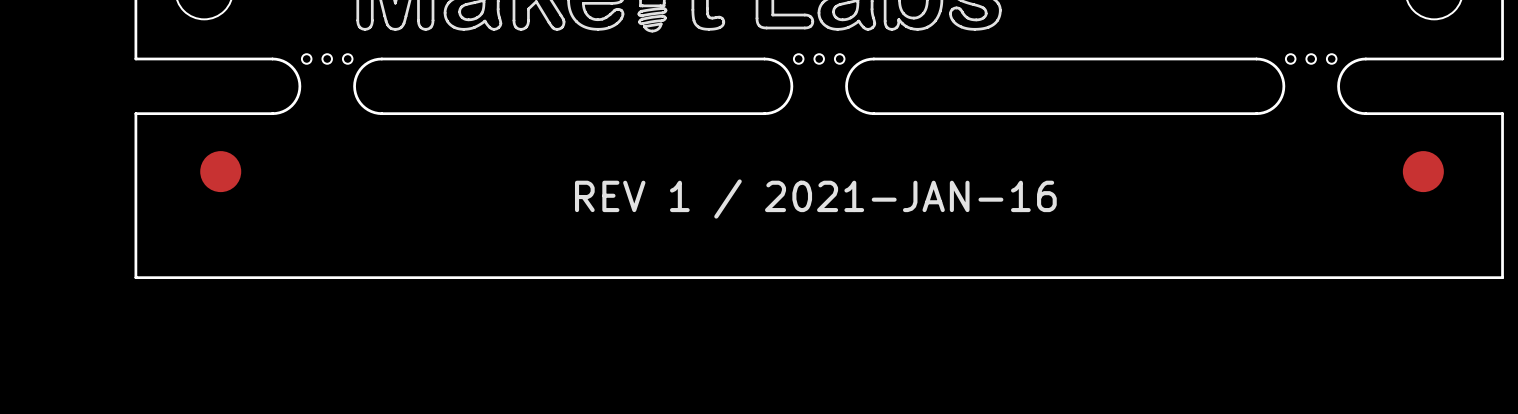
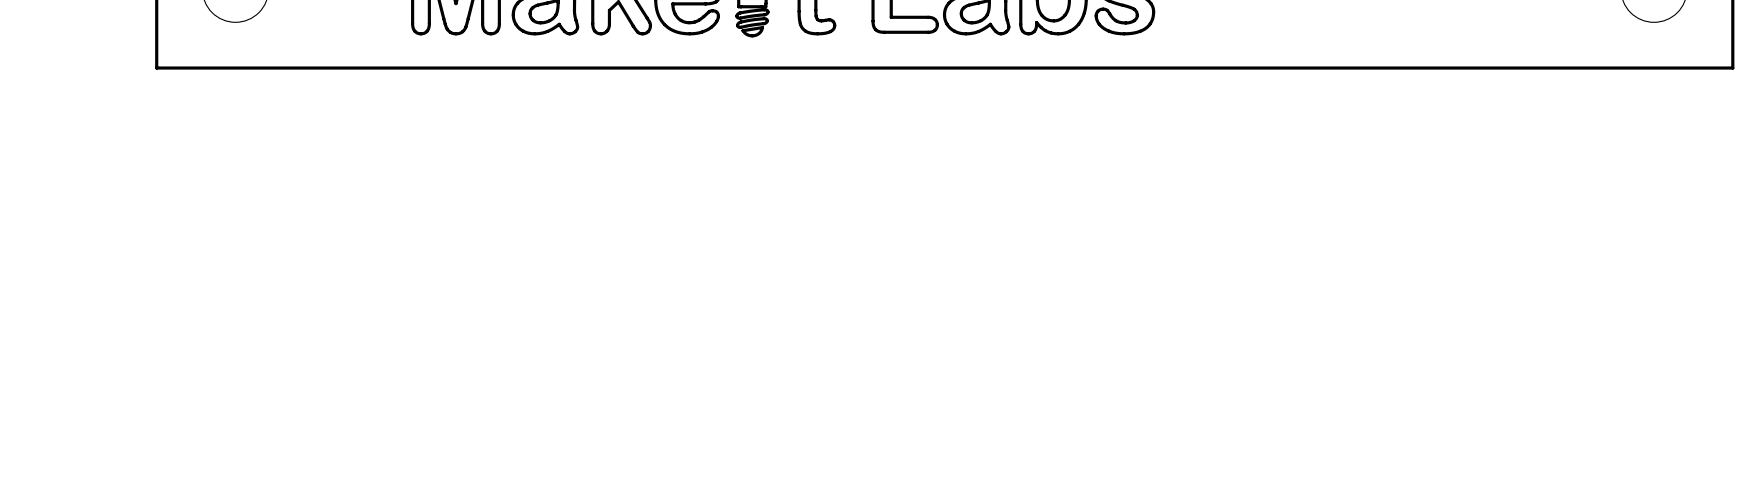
board edge: (272, 58) (289, 64) (296, 72) (299, 82) (296, 99) (283, 111) (272, 113) (135, 113) (135, 277) (1502, 277) (1502, 113) (1365, 113) (1355, 111) (1342, 99) (1338, 82) (1342, 72) (1349, 64) (1365, 58) -> (1449, 68) (1575, 68)
part: (327, 58) -> none
board edge: (381, 58) (371, 61) (362, 66) (356, 75) (354, 86) (356, 96) (362, 105) (371, 111) (381, 113) (768, 113) (783, 105) (789, 96) (791, 86) (789, 75) (783, 66) (775, 61) (764, 58) -> (440, 68) (314, 68)
part: (819, 58) -> none
board edge: (873, 58) (863, 61) (854, 66) (848, 75) (846, 86) (848, 96) (854, 105) (863, 111) (873, 113) (1260, 113) (1275, 105) (1281, 96) (1283, 86) (1281, 75) (1275, 66) (1266, 61) (1256, 58) -> (1007, 68) (881, 68)
part: (1311, 58) -> none
part: (220, 171) -> none
part: (1423, 171) -> none
text: REV 1 / 2021-JAN-16 (815, 199) -> none

